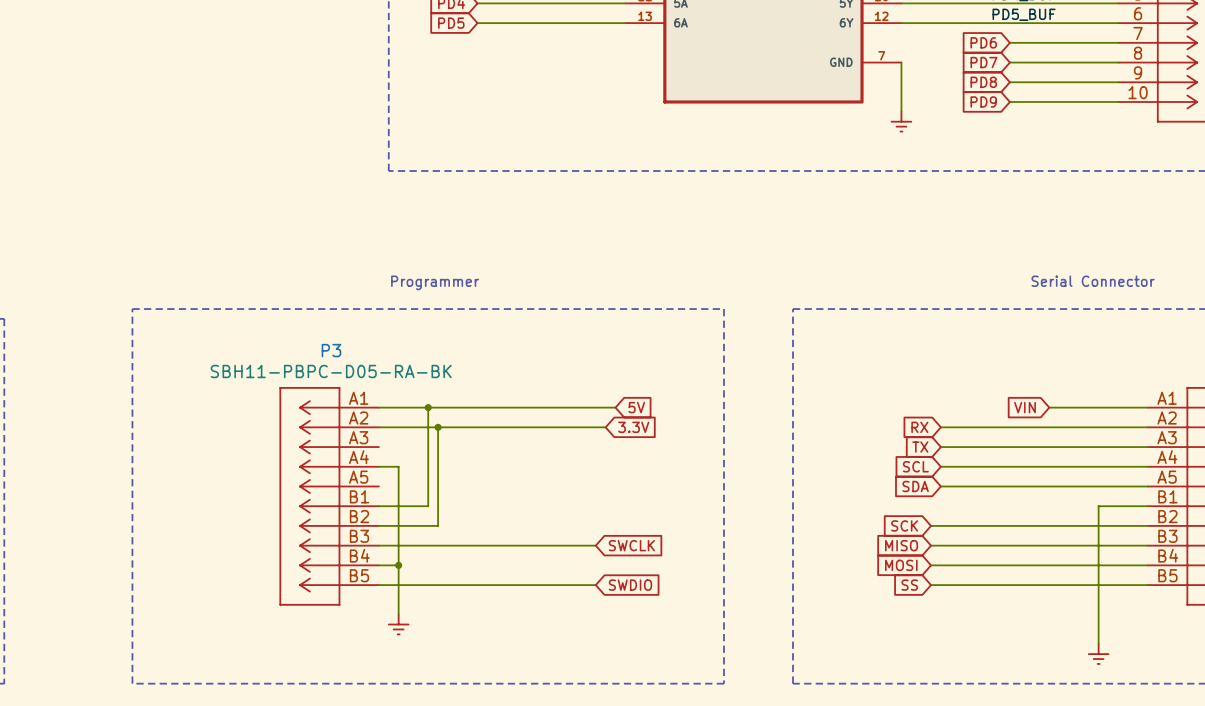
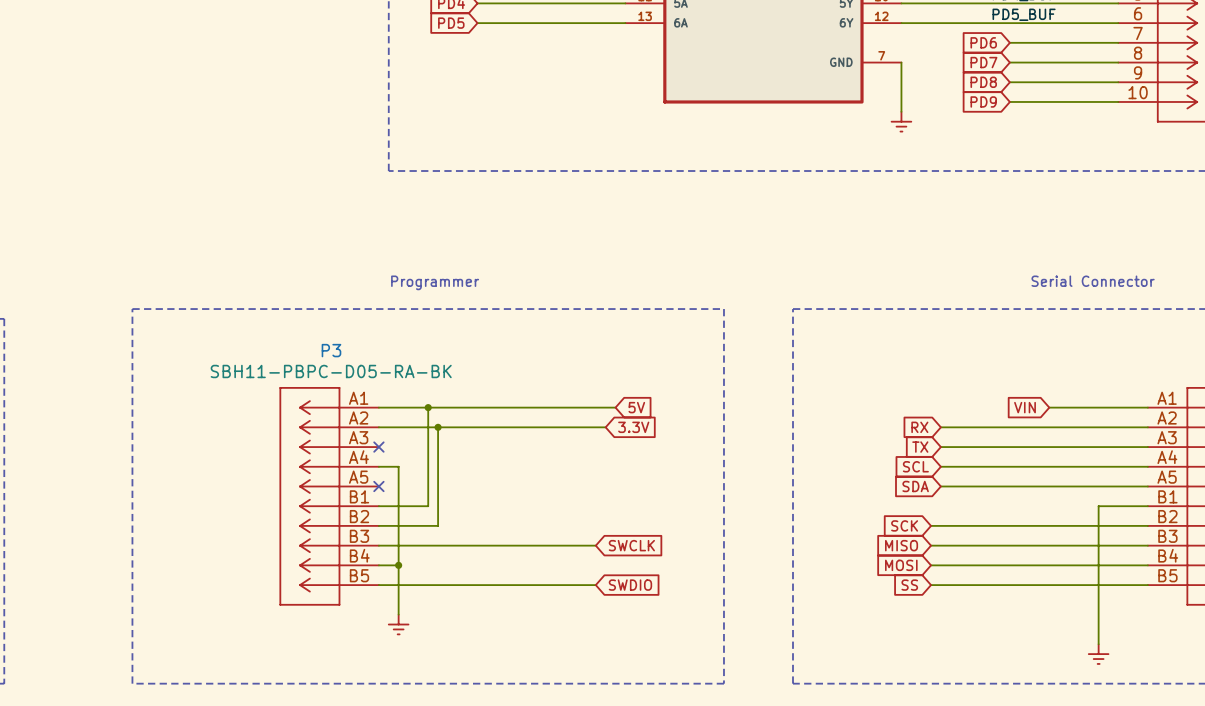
no-connect mark: none -> (378, 447)
no-connect mark: none -> (378, 486)

